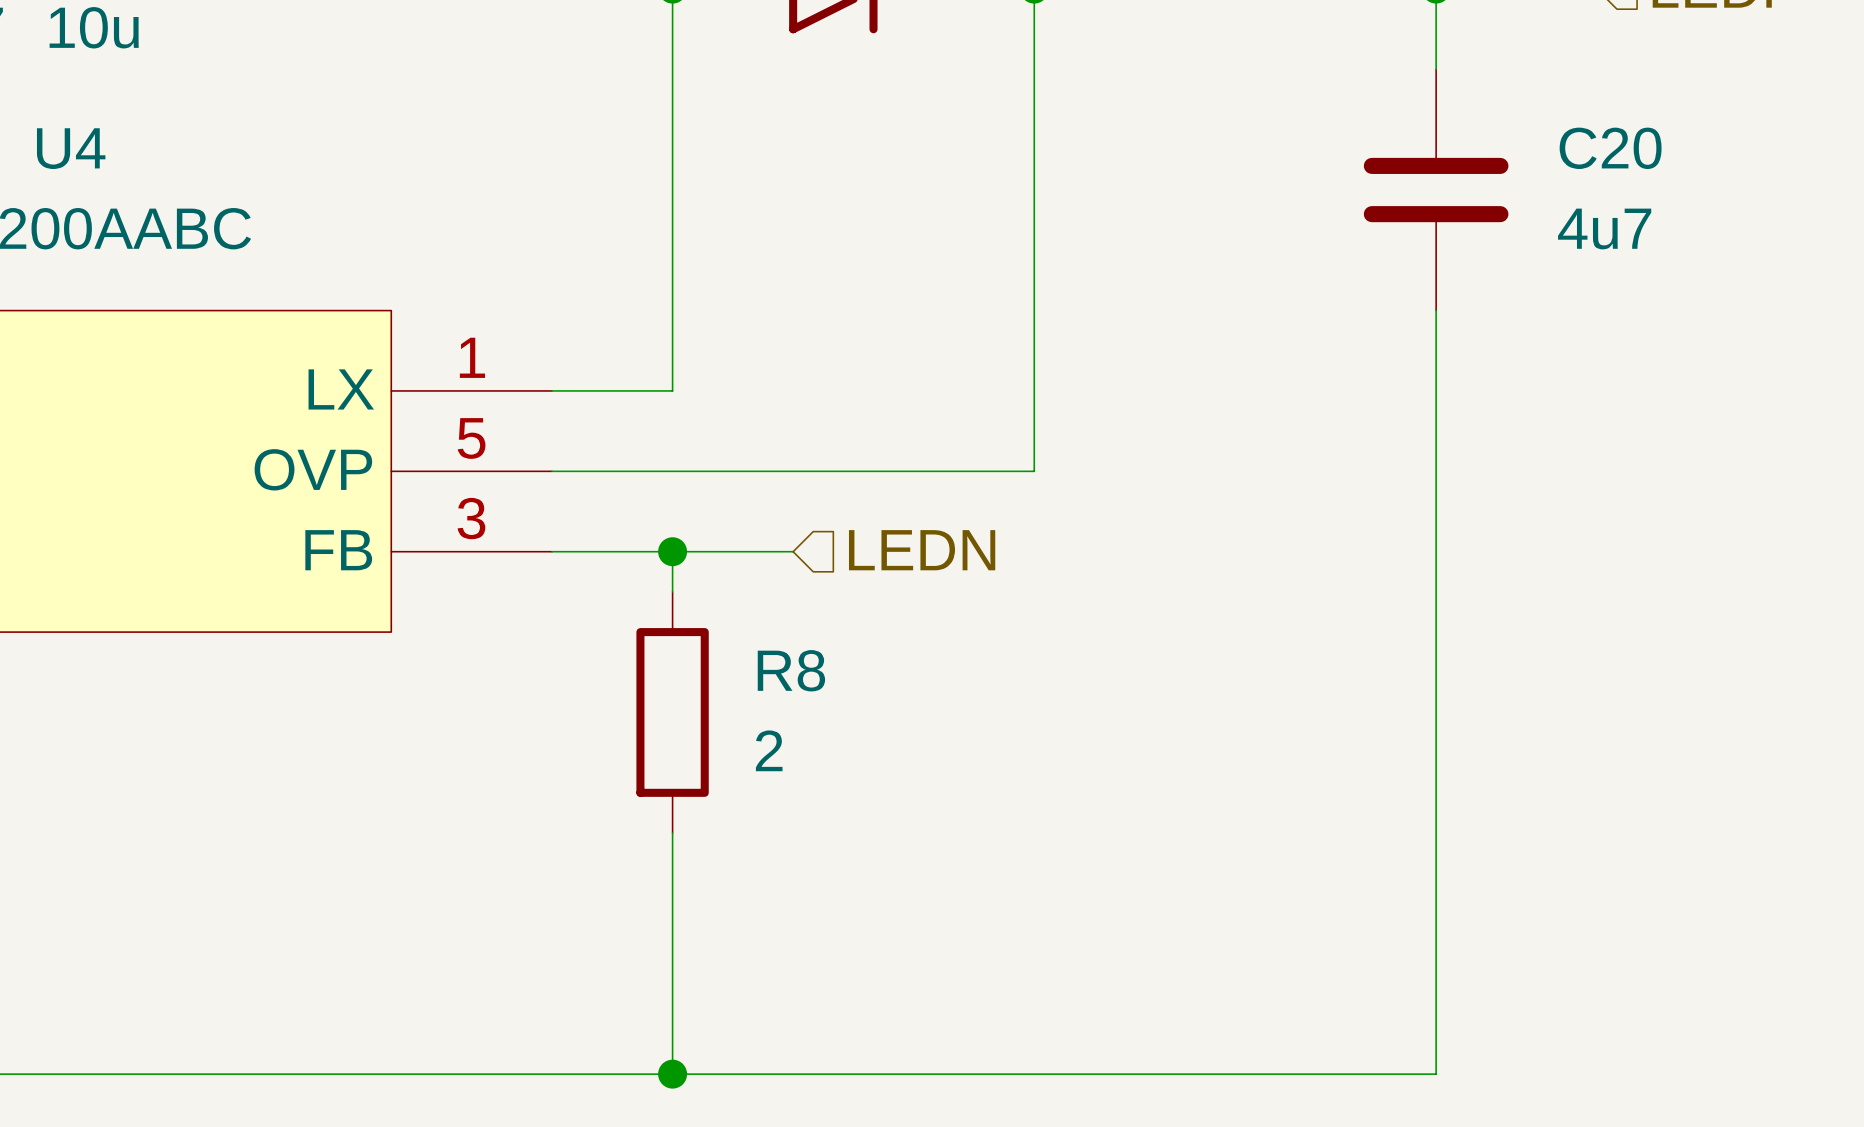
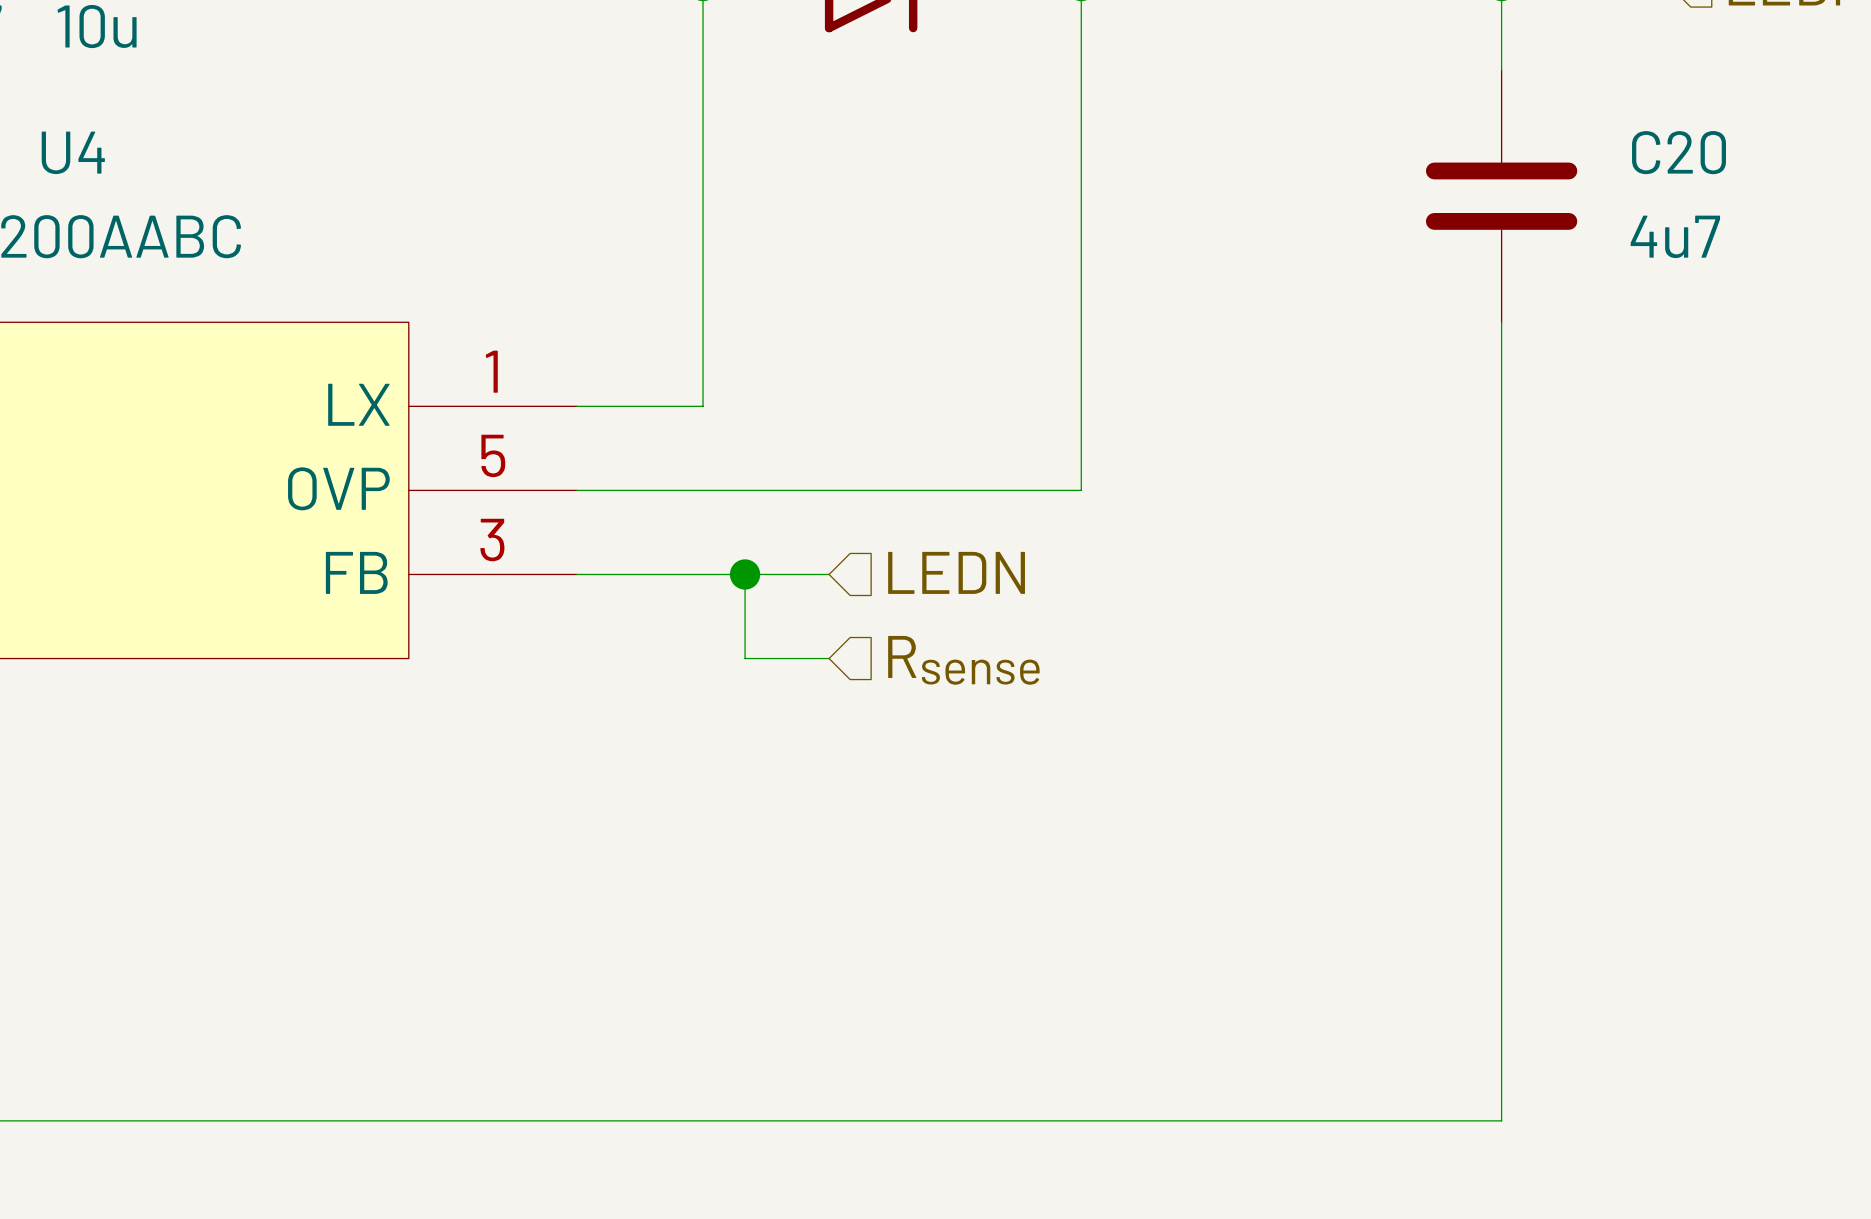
wire: (672, 551) (672, 591) -> none
junction position: (672, 551) -> (745, 574)
wire: none -> (745, 574) (745, 658) (829, 658)
hierarchical label: none -> Rsense (963, 660)
R8: 2 (672, 712) -> none
wire: (672, 833) (672, 1074) -> none
junction: (672, 1074) -> none

